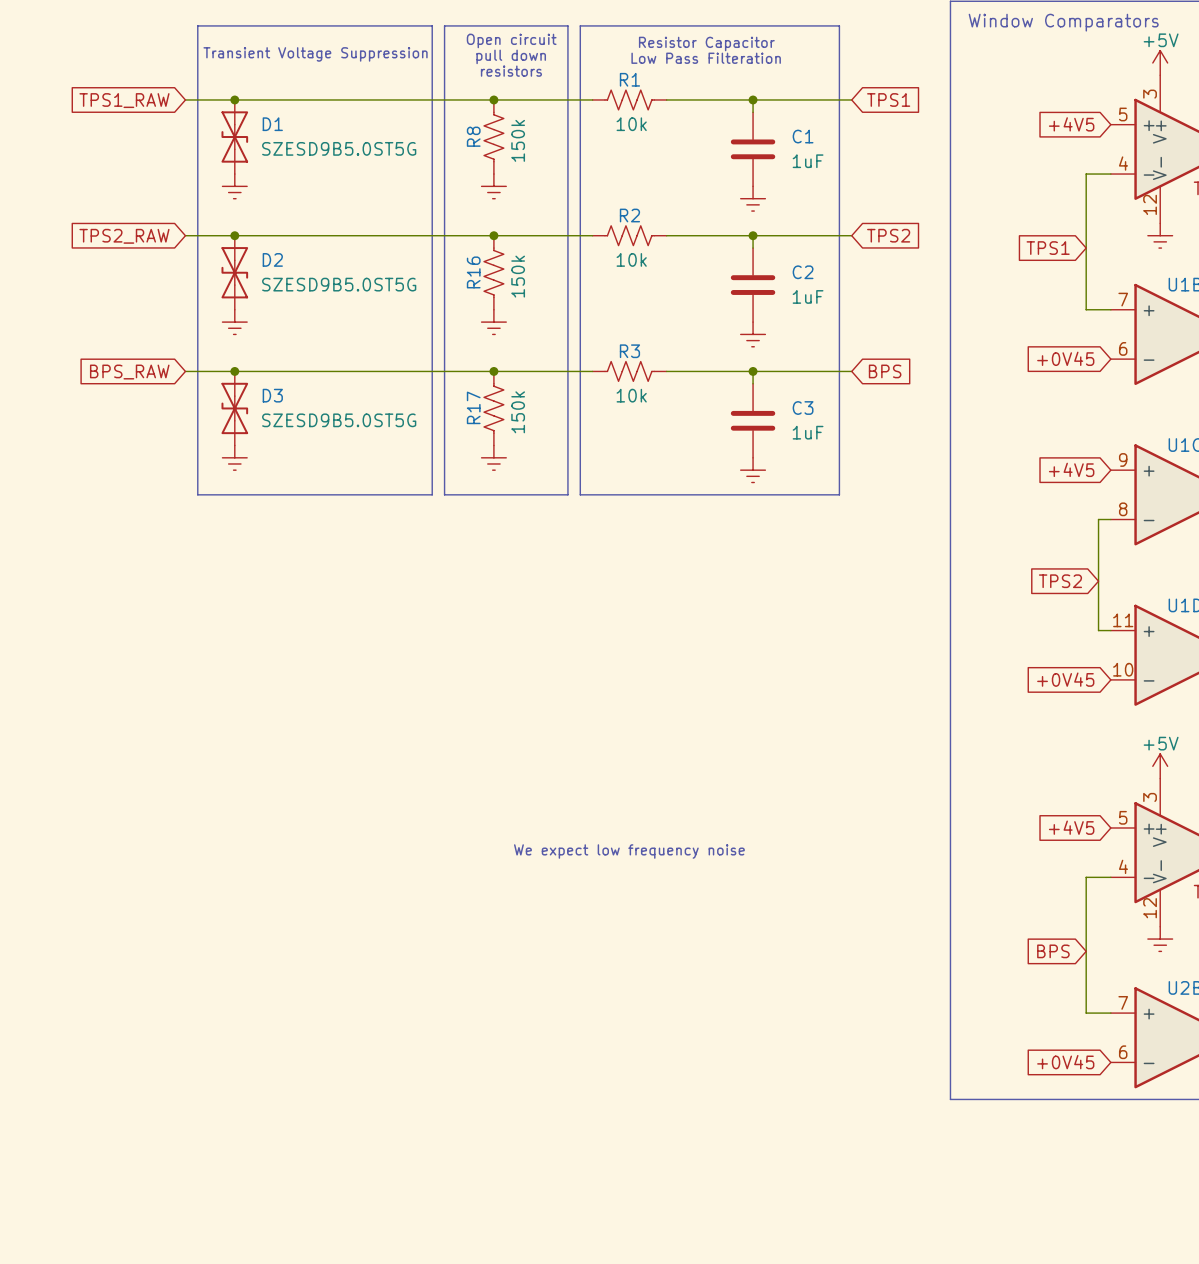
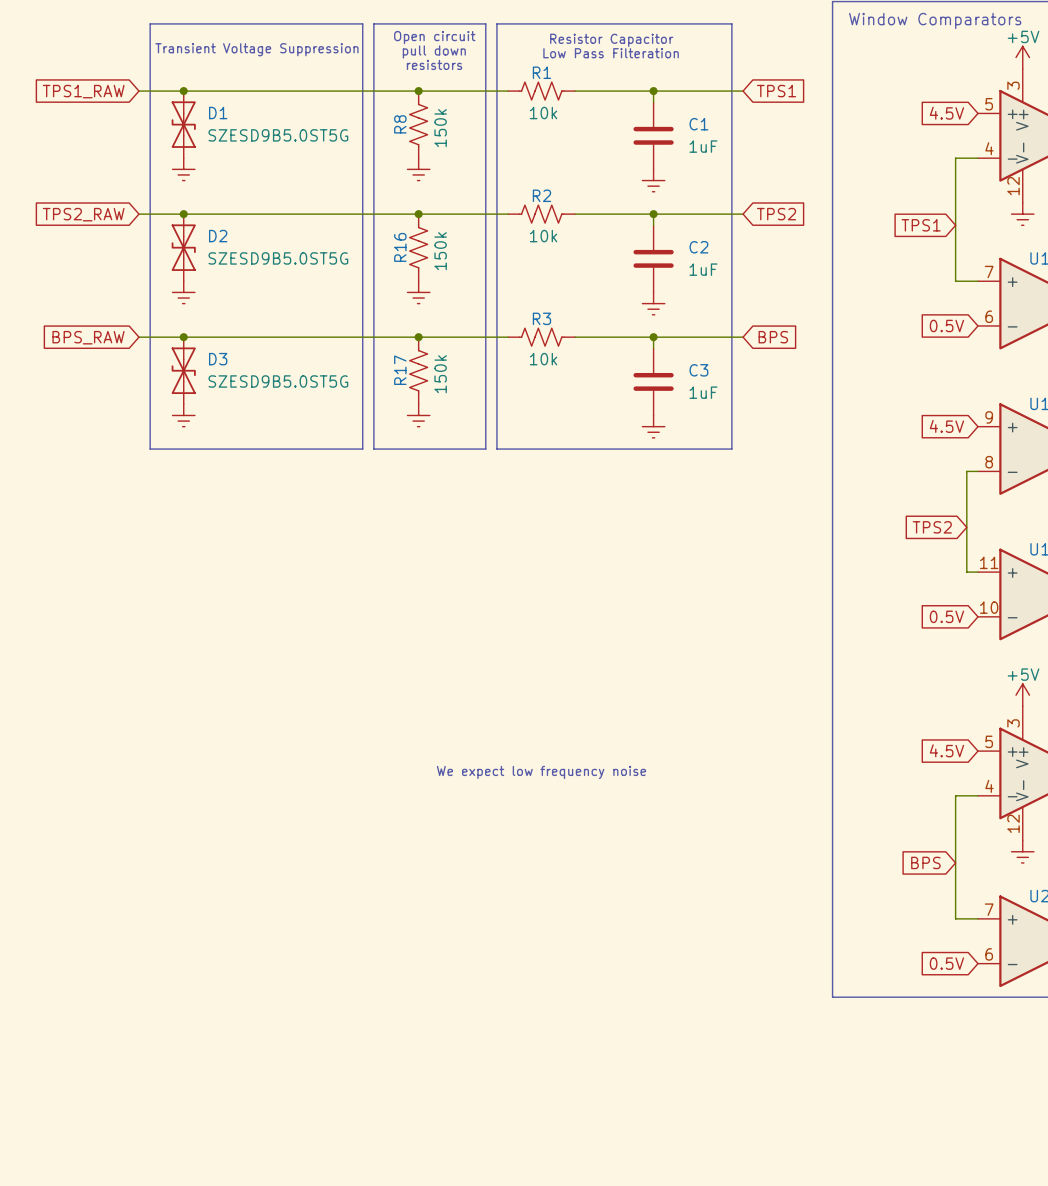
global label: +4V5 (1071, 124) -> 4.5V (946, 113)
global label: +0V45 (1065, 358) -> 0.5V (946, 325)
global label: +4V5 (1071, 469) -> 4.5V (946, 426)
global label: +0V45 (1065, 679) -> 0.5V (946, 616)
global label: +4V5 (1071, 827) -> 4.5V (946, 750)
global label: +0V45 (1065, 1062) -> 0.5V (946, 963)

